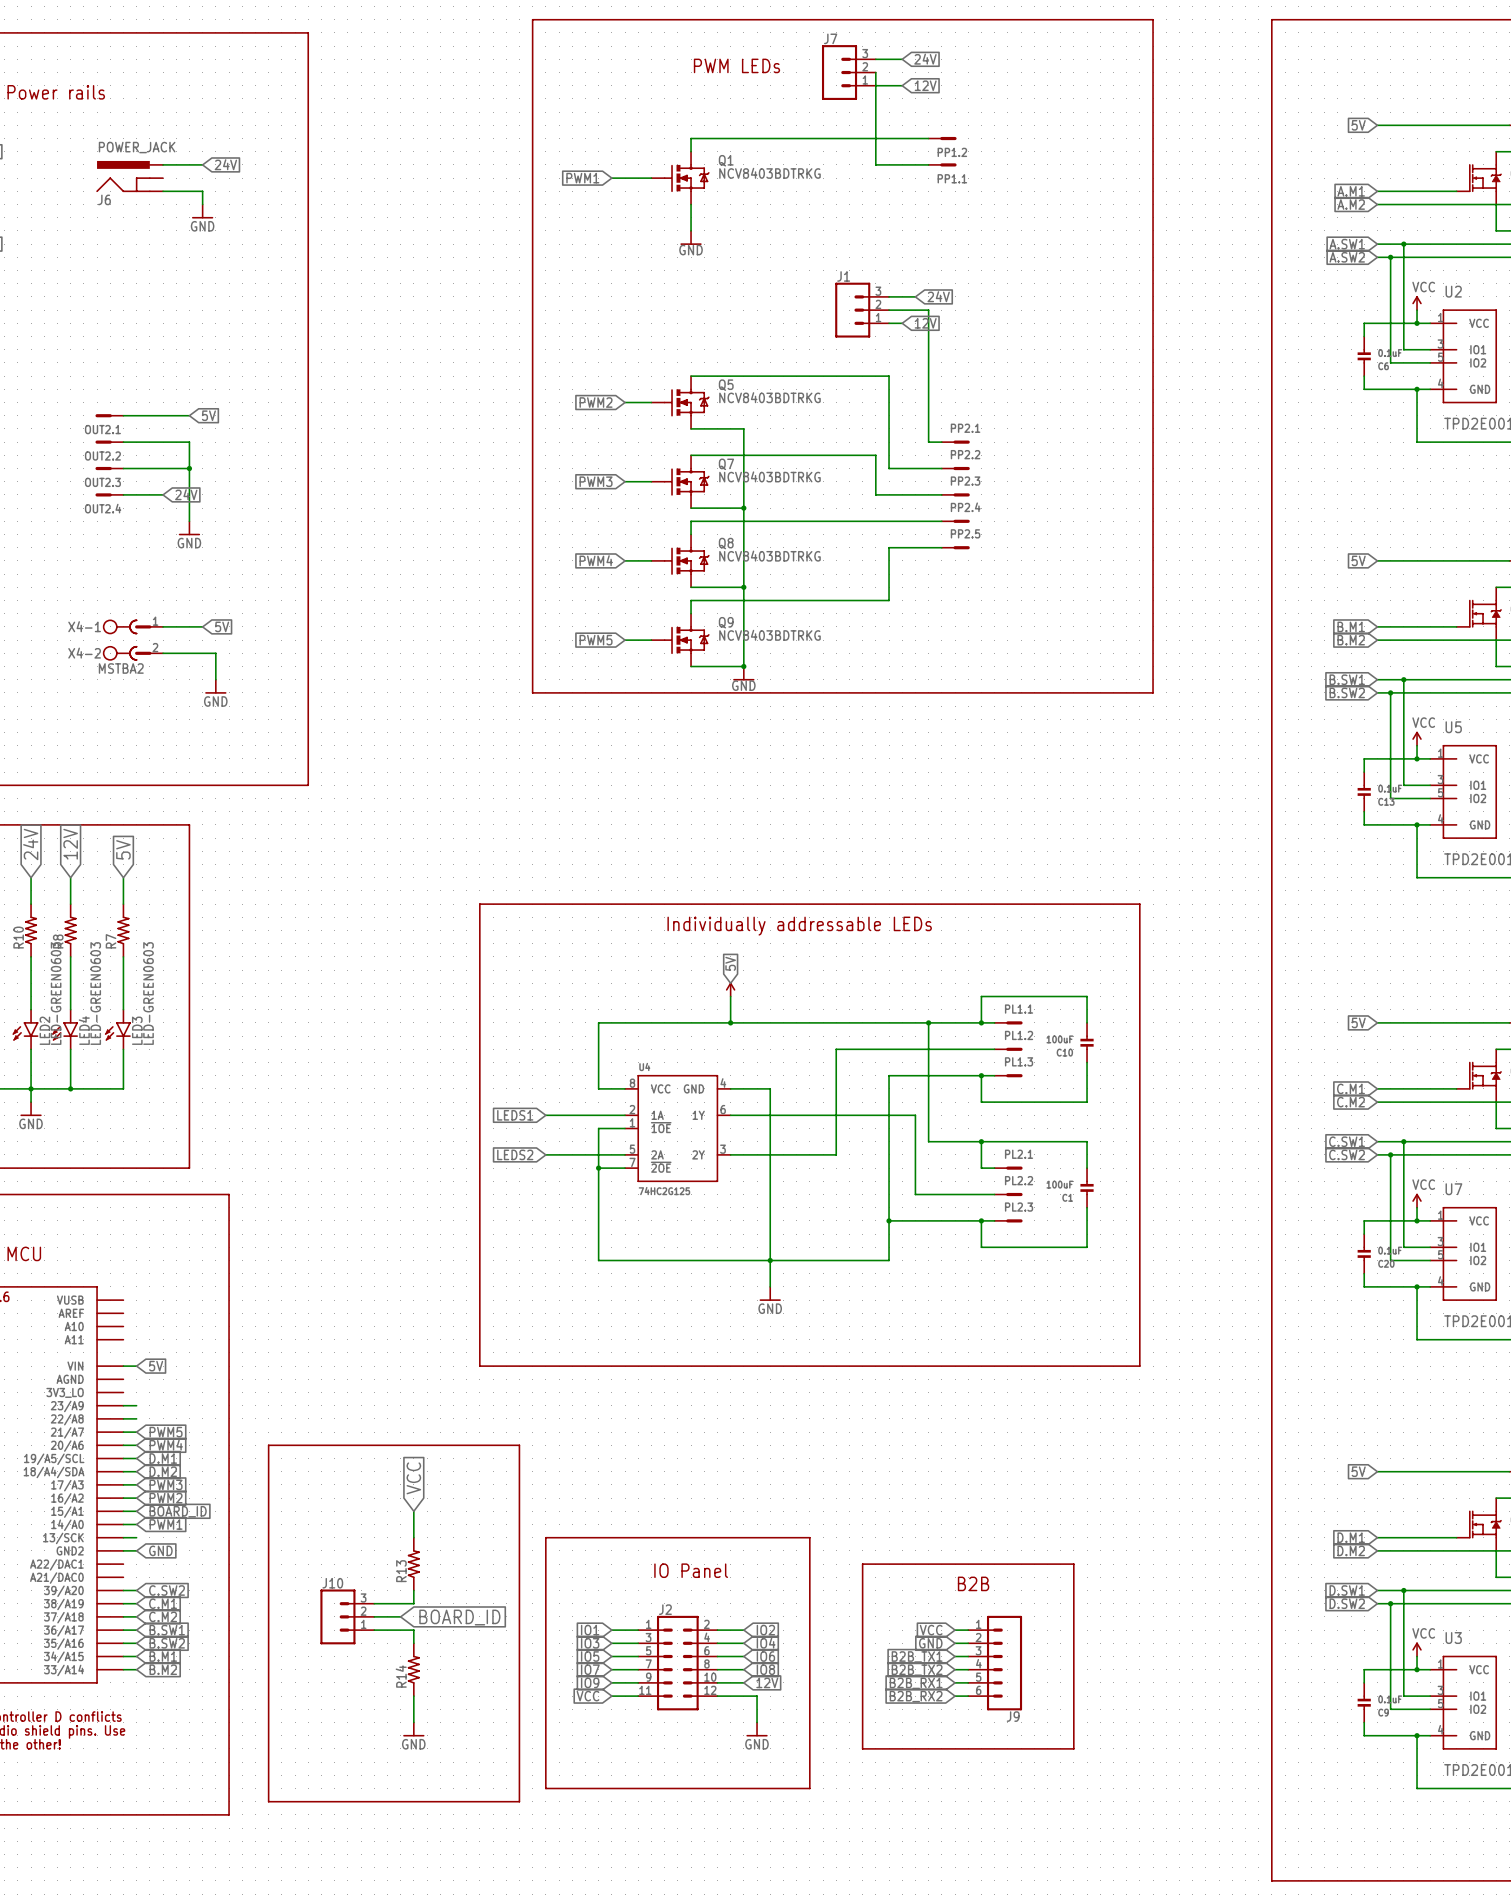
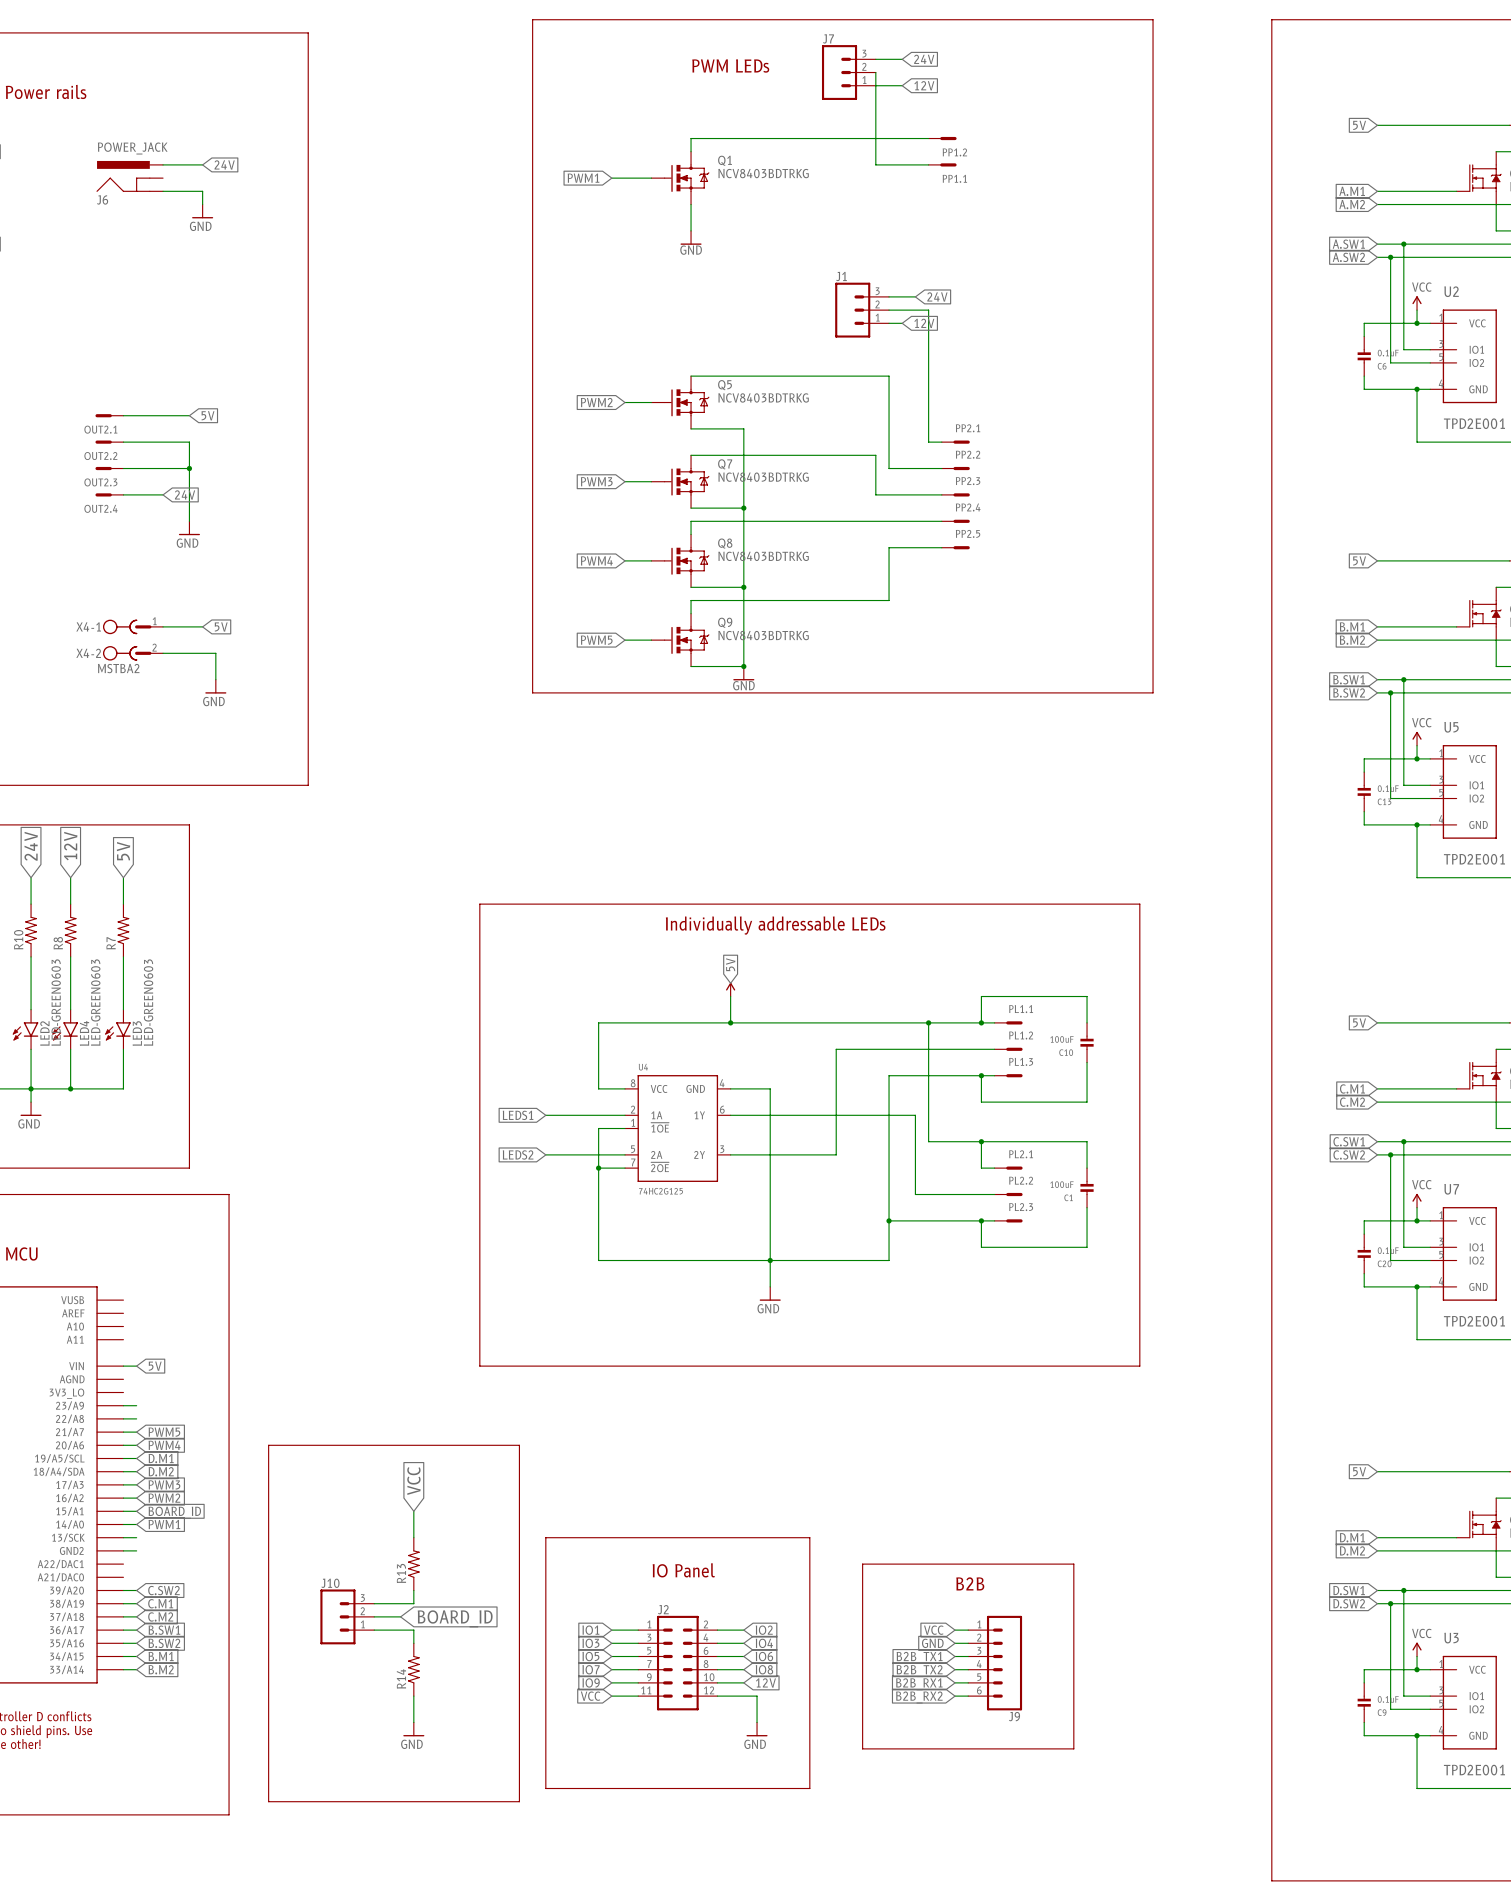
global label: GND (160, 1550) -> none

